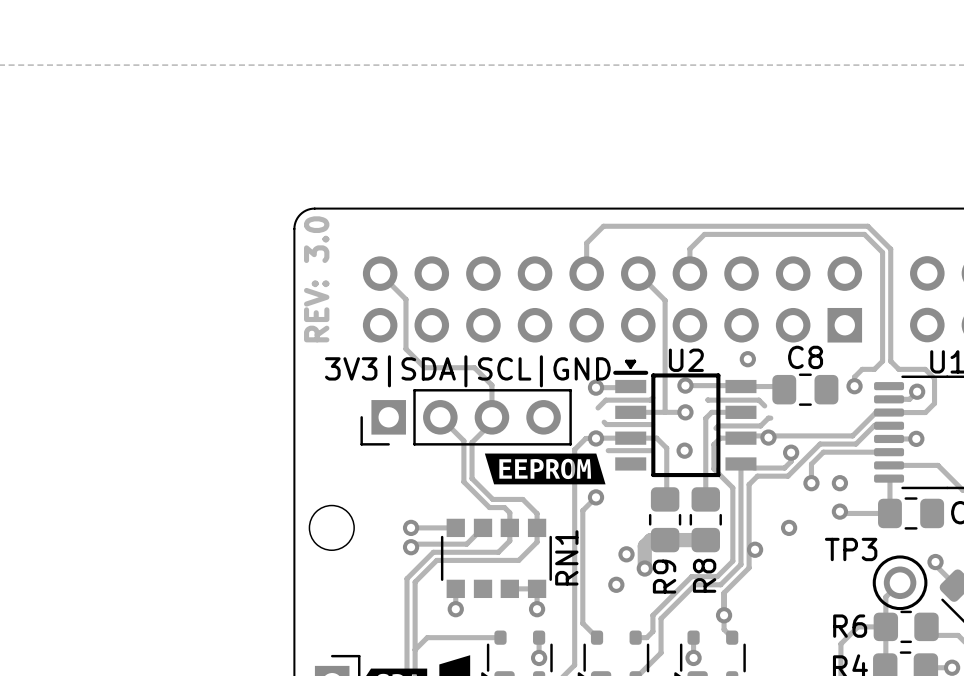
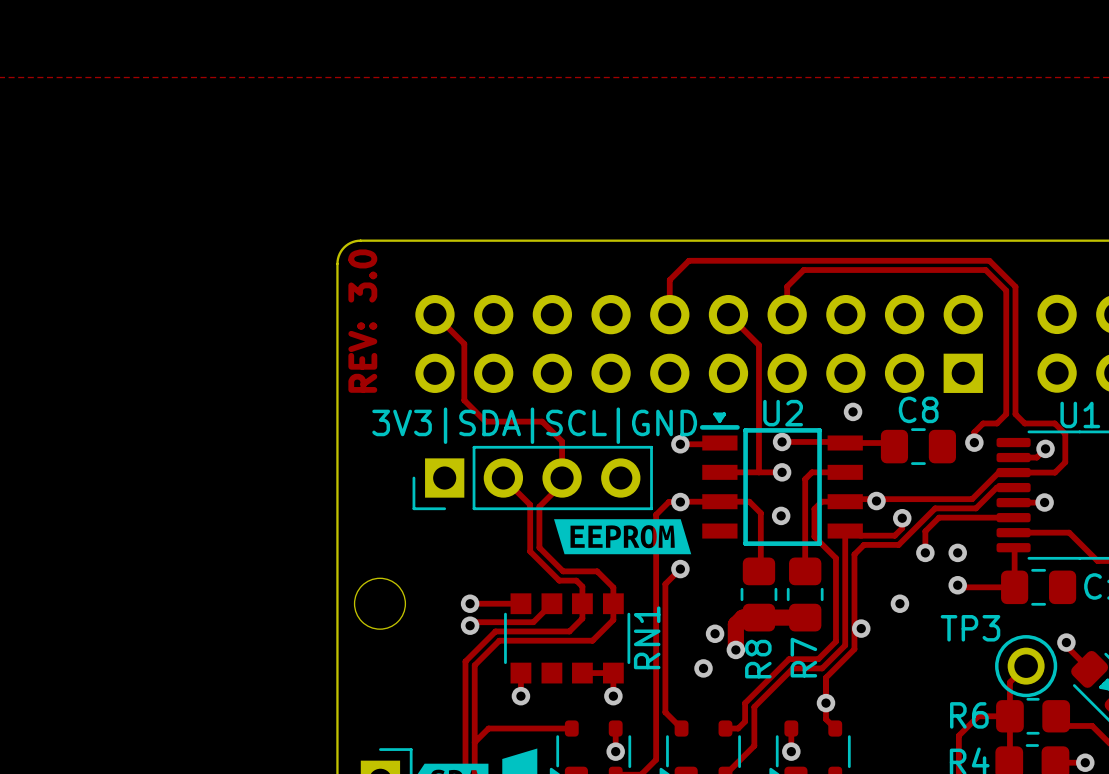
track: (652, 397) (650, 400) (605, 400) (598, 407) -> none
track: (707, 399) (758, 400) (764, 405) -> none
track: (770, 418) (760, 425) (718, 425) (715, 428) -> none
track: (604, 422) (606, 424) (652, 424) -> none
track: (608, 450) (650, 450) -> none
R8 name: R8 (704, 575) -> R7 (803, 657)
R9 name: R9 (664, 576) -> R8 (758, 659)

